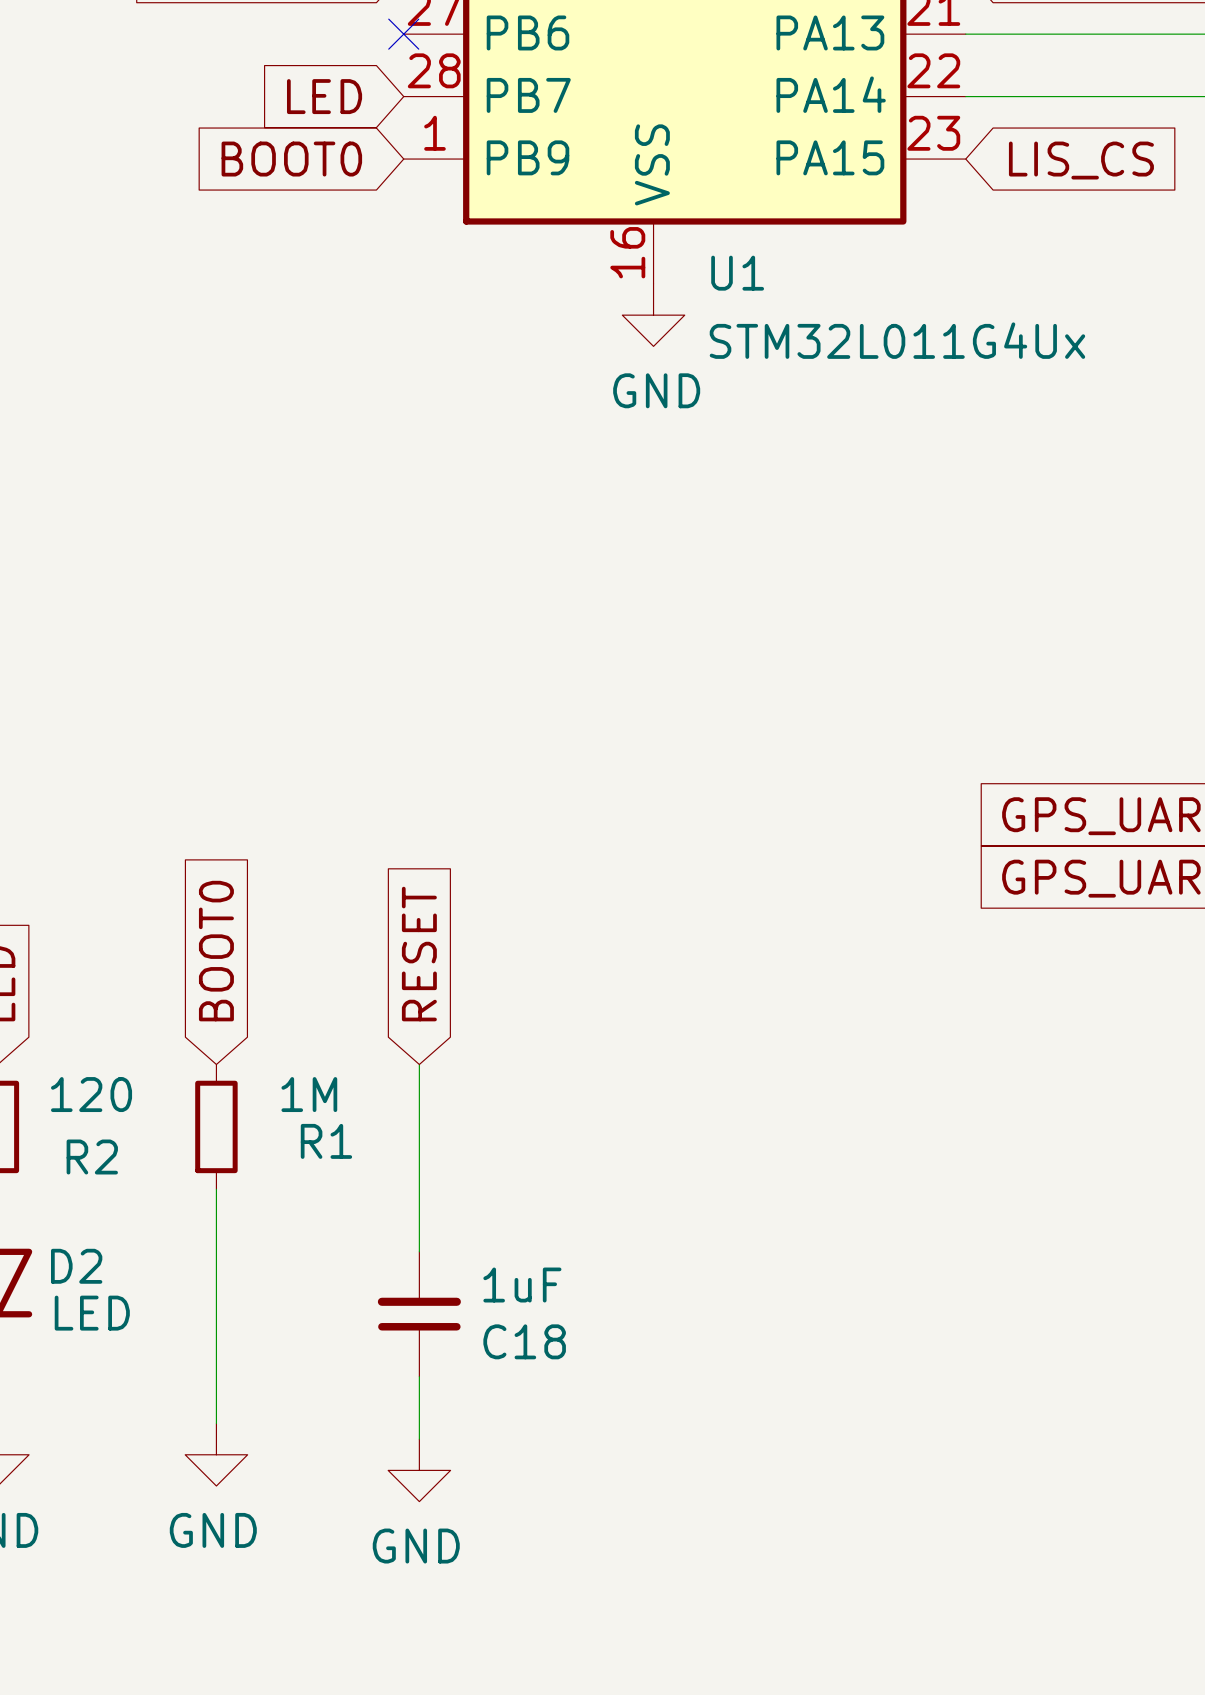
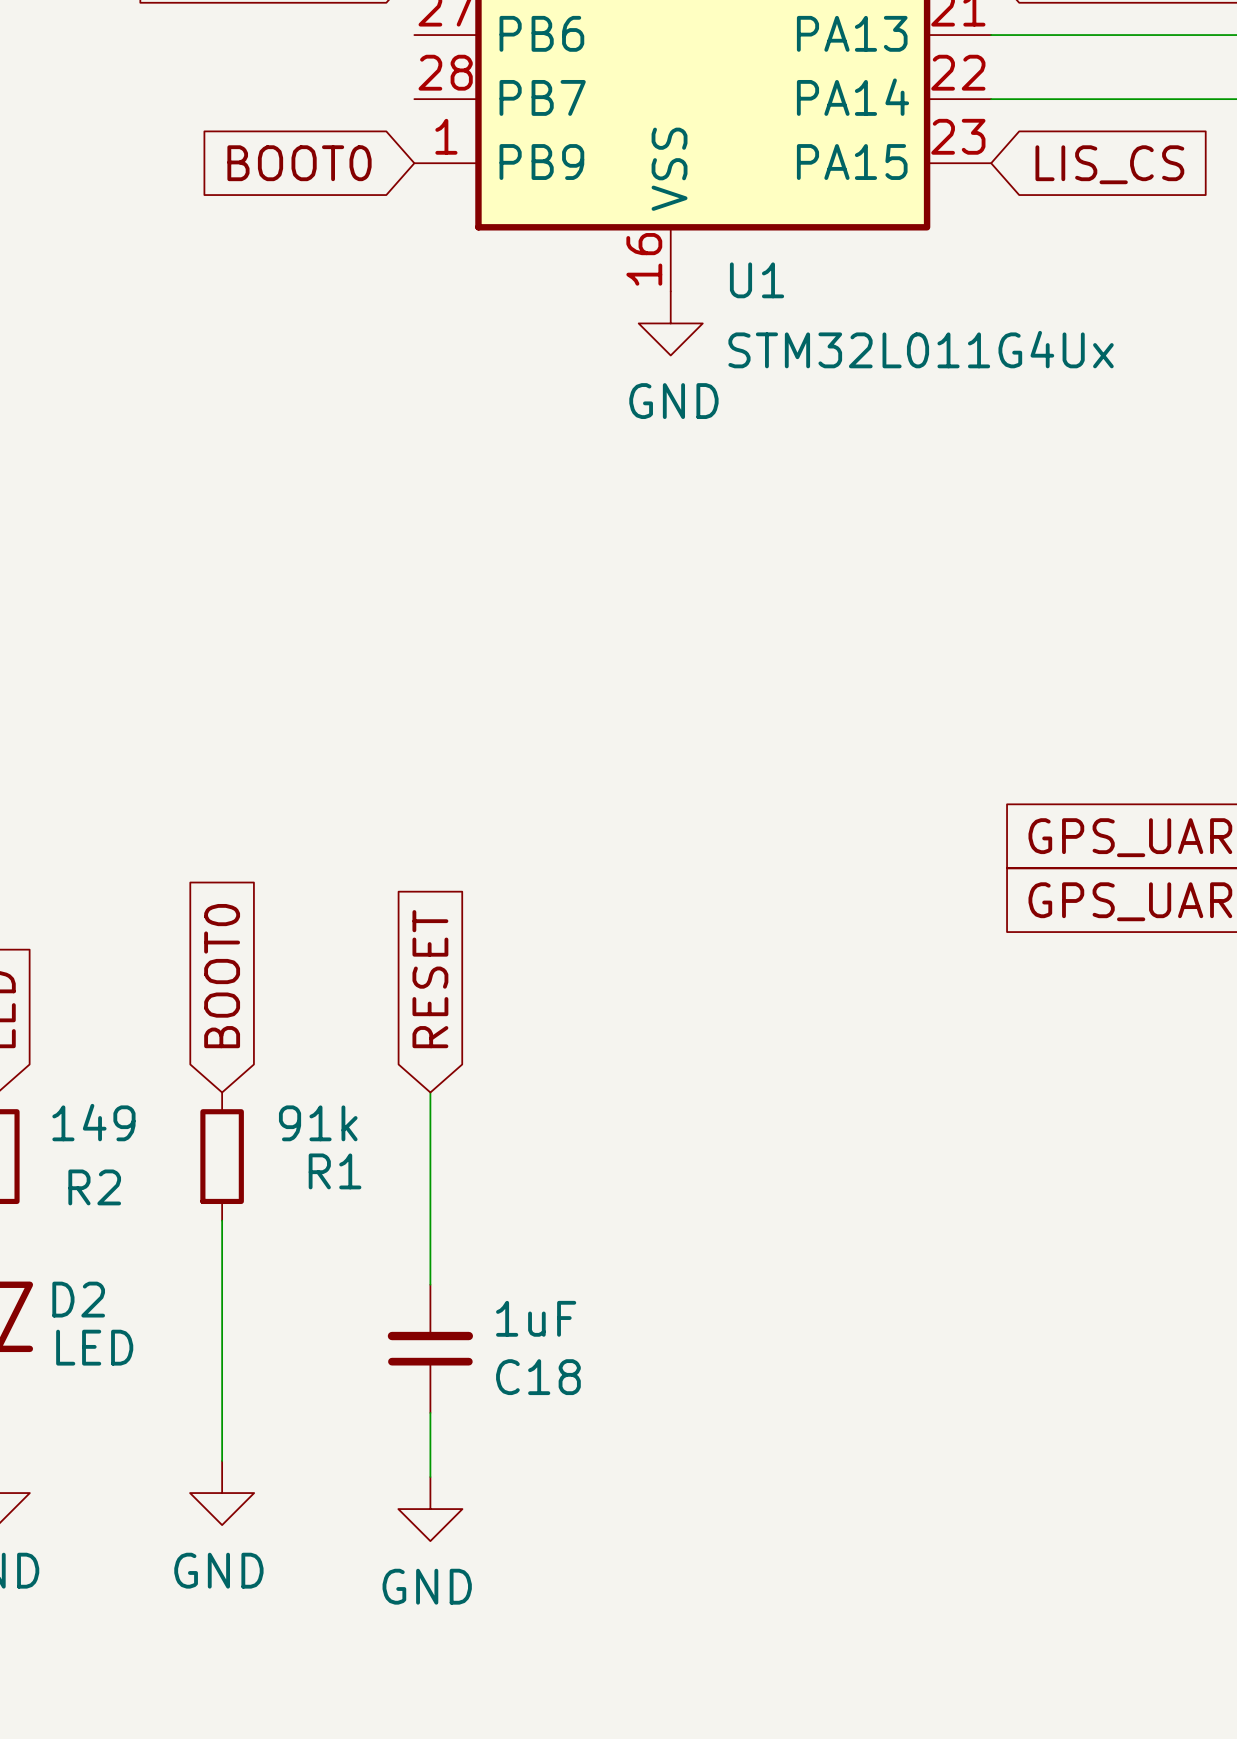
no-connect mark: (403, 34) -> none
global label: LED (324, 96) -> none
R2 value: 120 (91, 1094) -> 149 (93, 1122)
R1 value: 1M (309, 1094) -> 91k (318, 1123)

